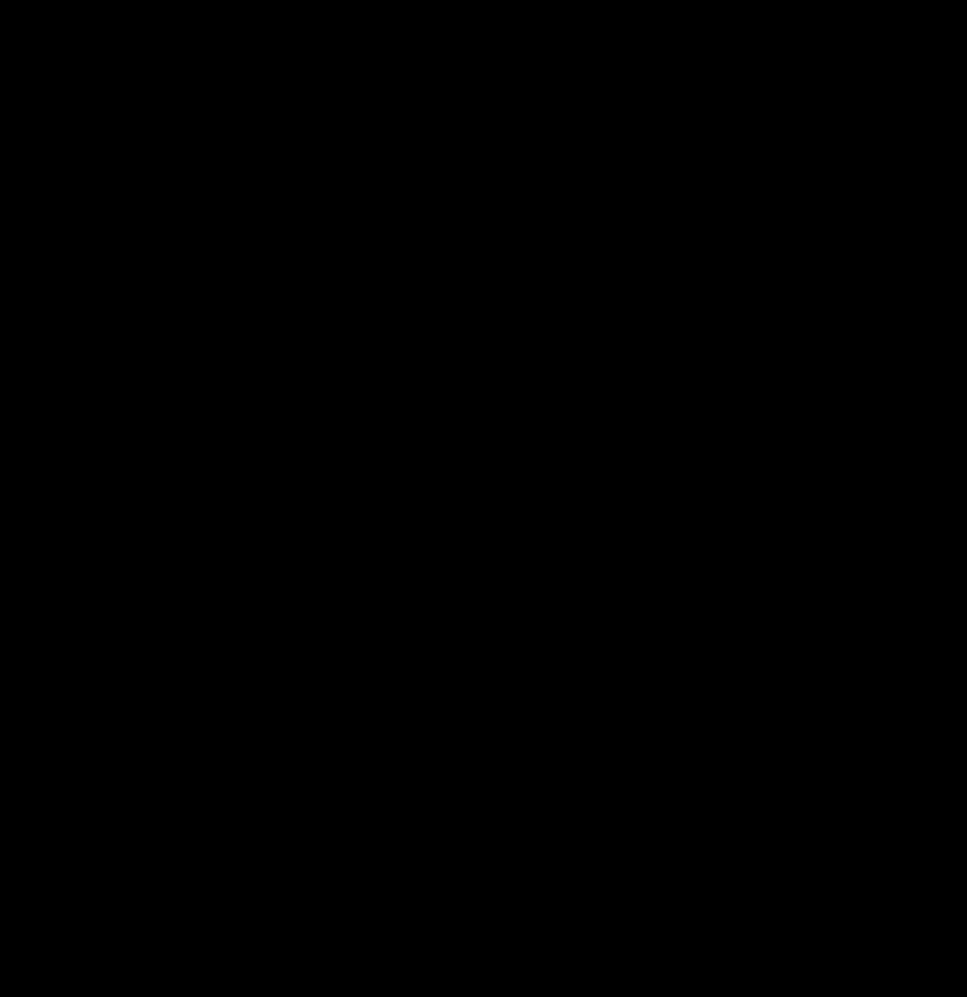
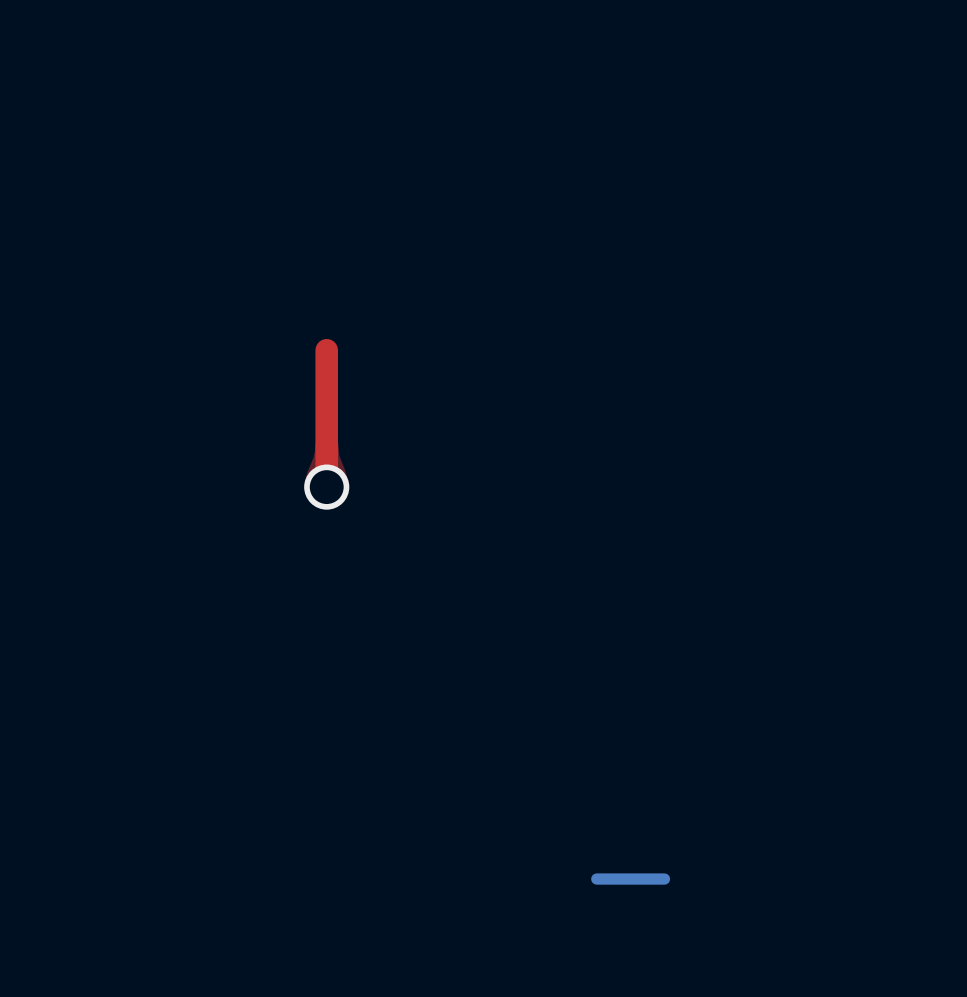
top track: none -> (326, 350) (326, 487)
via: none -> (326, 487)
bottom track: none -> (596, 879) (664, 879)

